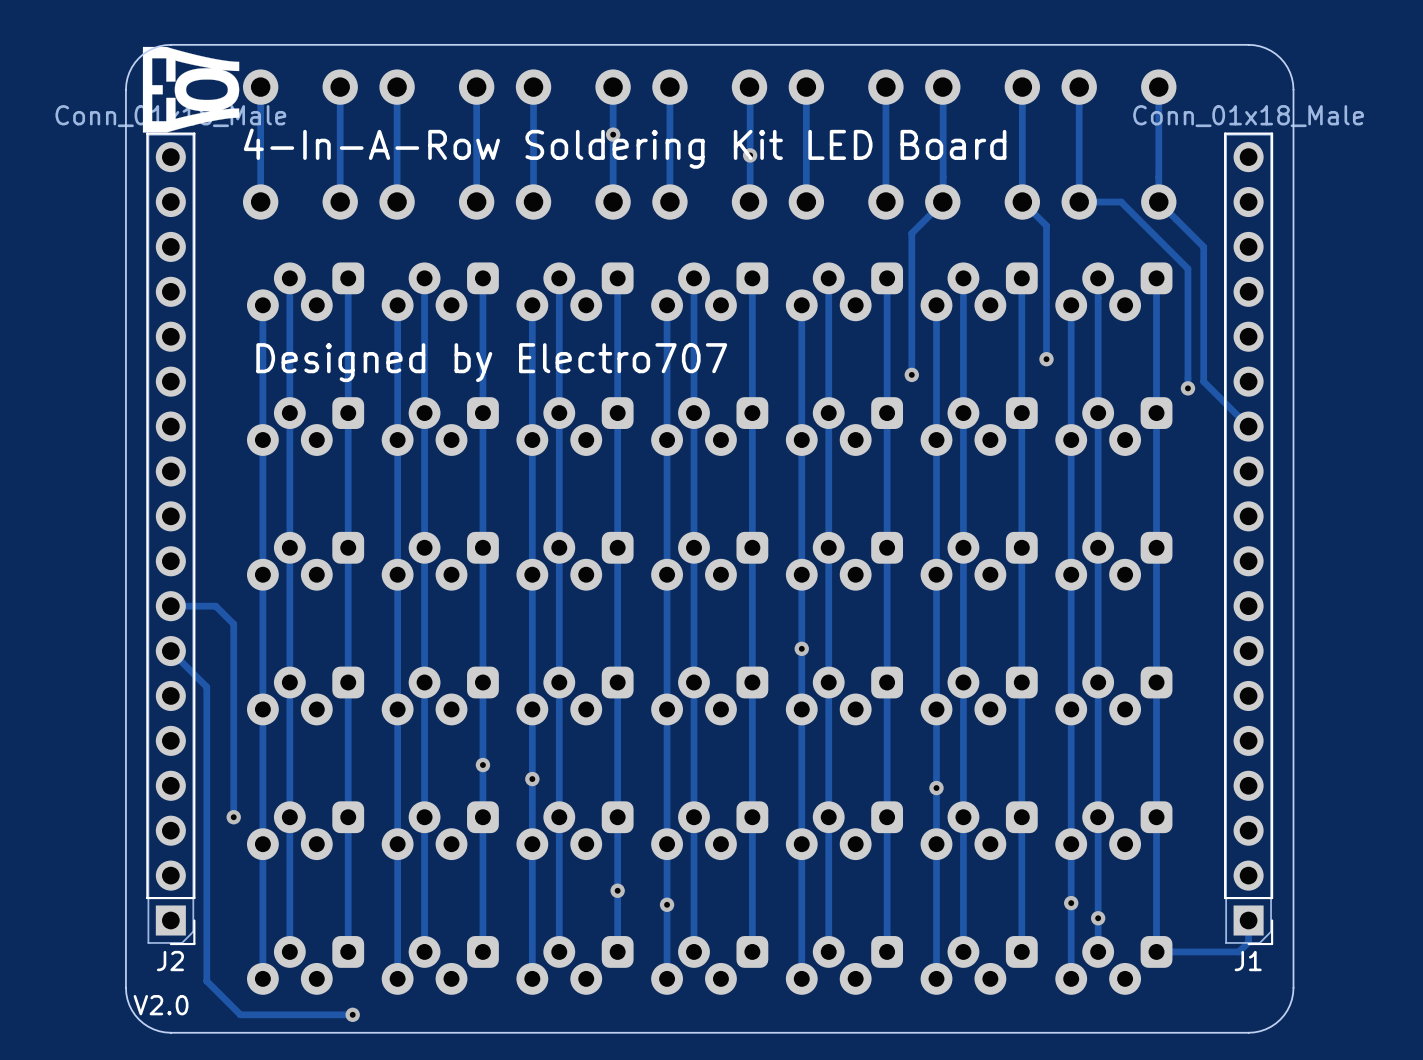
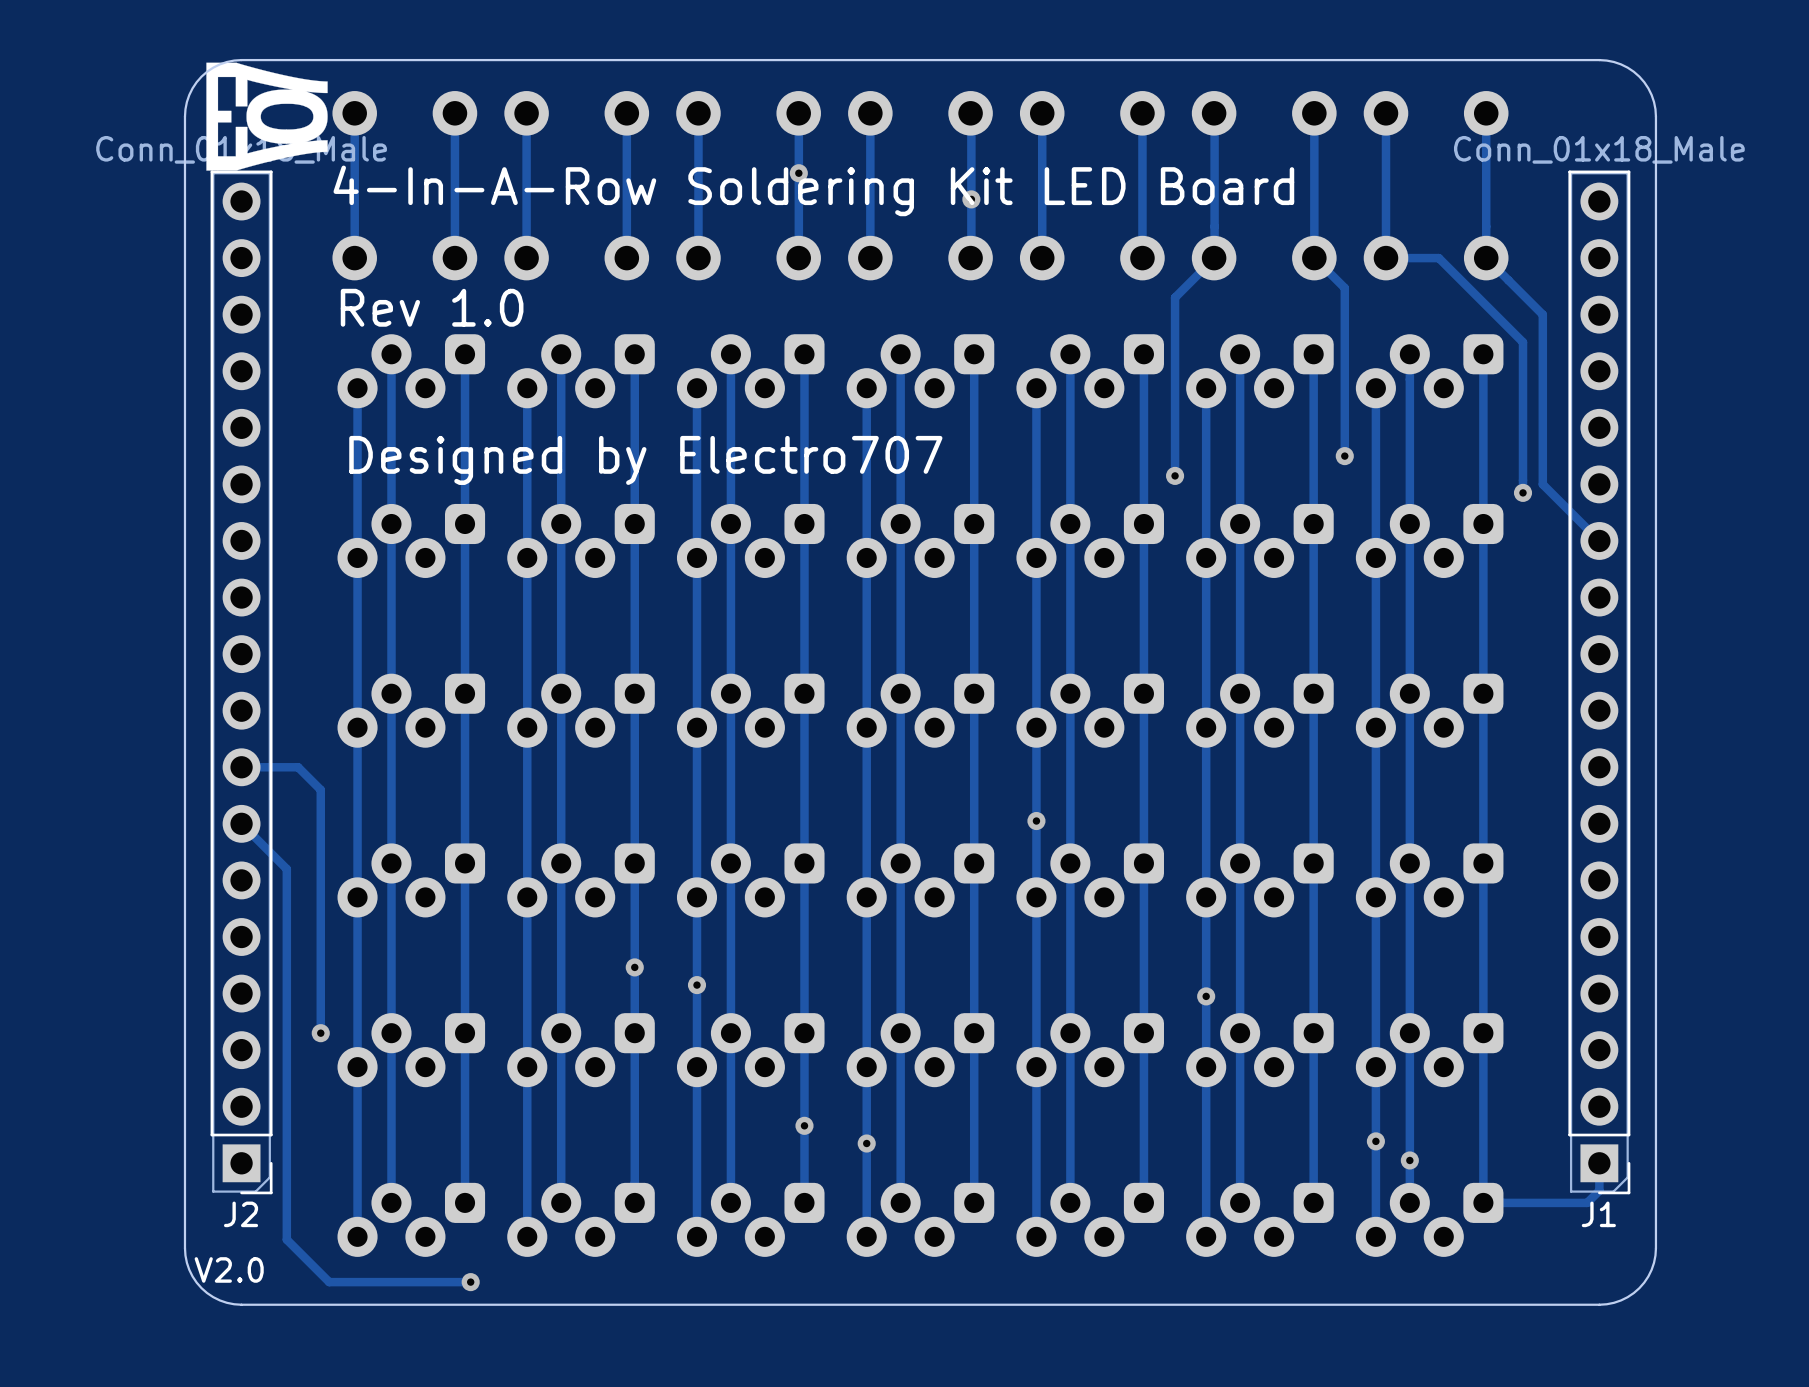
text: none -> Rev 1.0 (432, 307)

